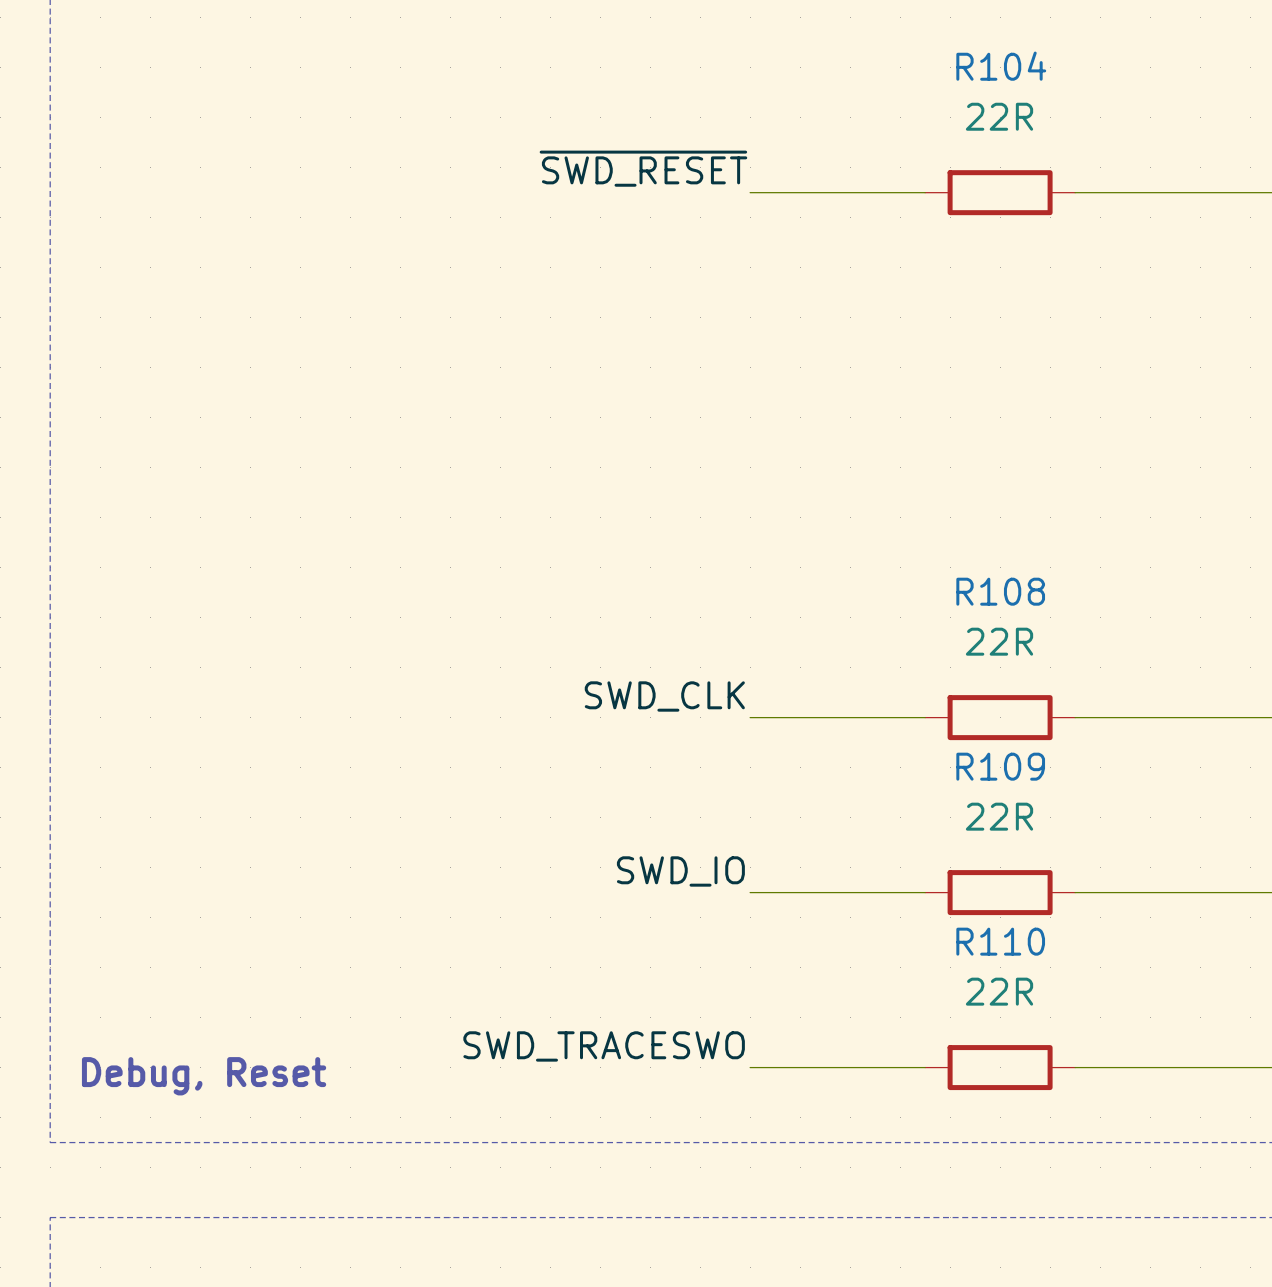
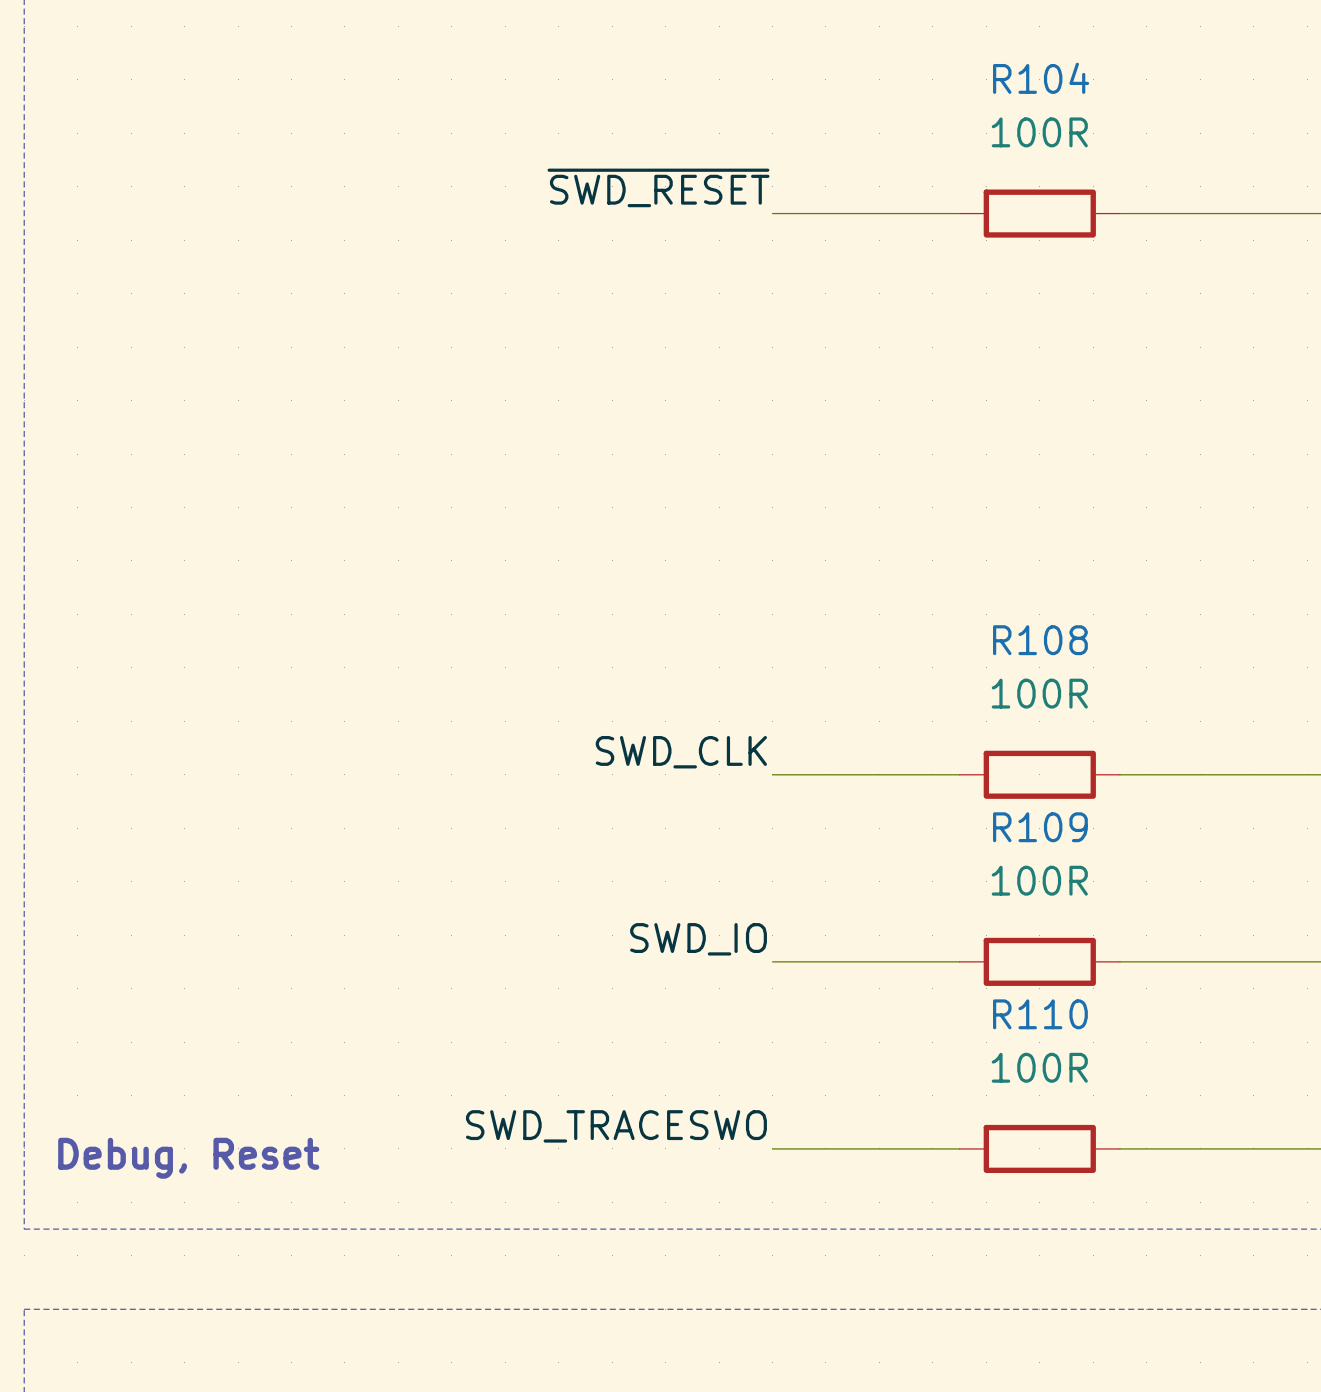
R104 value: 22R (999, 116) -> 100R (1039, 132)
R108 value: 22R (999, 641) -> 100R (1039, 693)
R109 value: 22R (999, 816) -> 100R (1039, 880)
R110 value: 22R (999, 991) -> 100R (1039, 1067)

